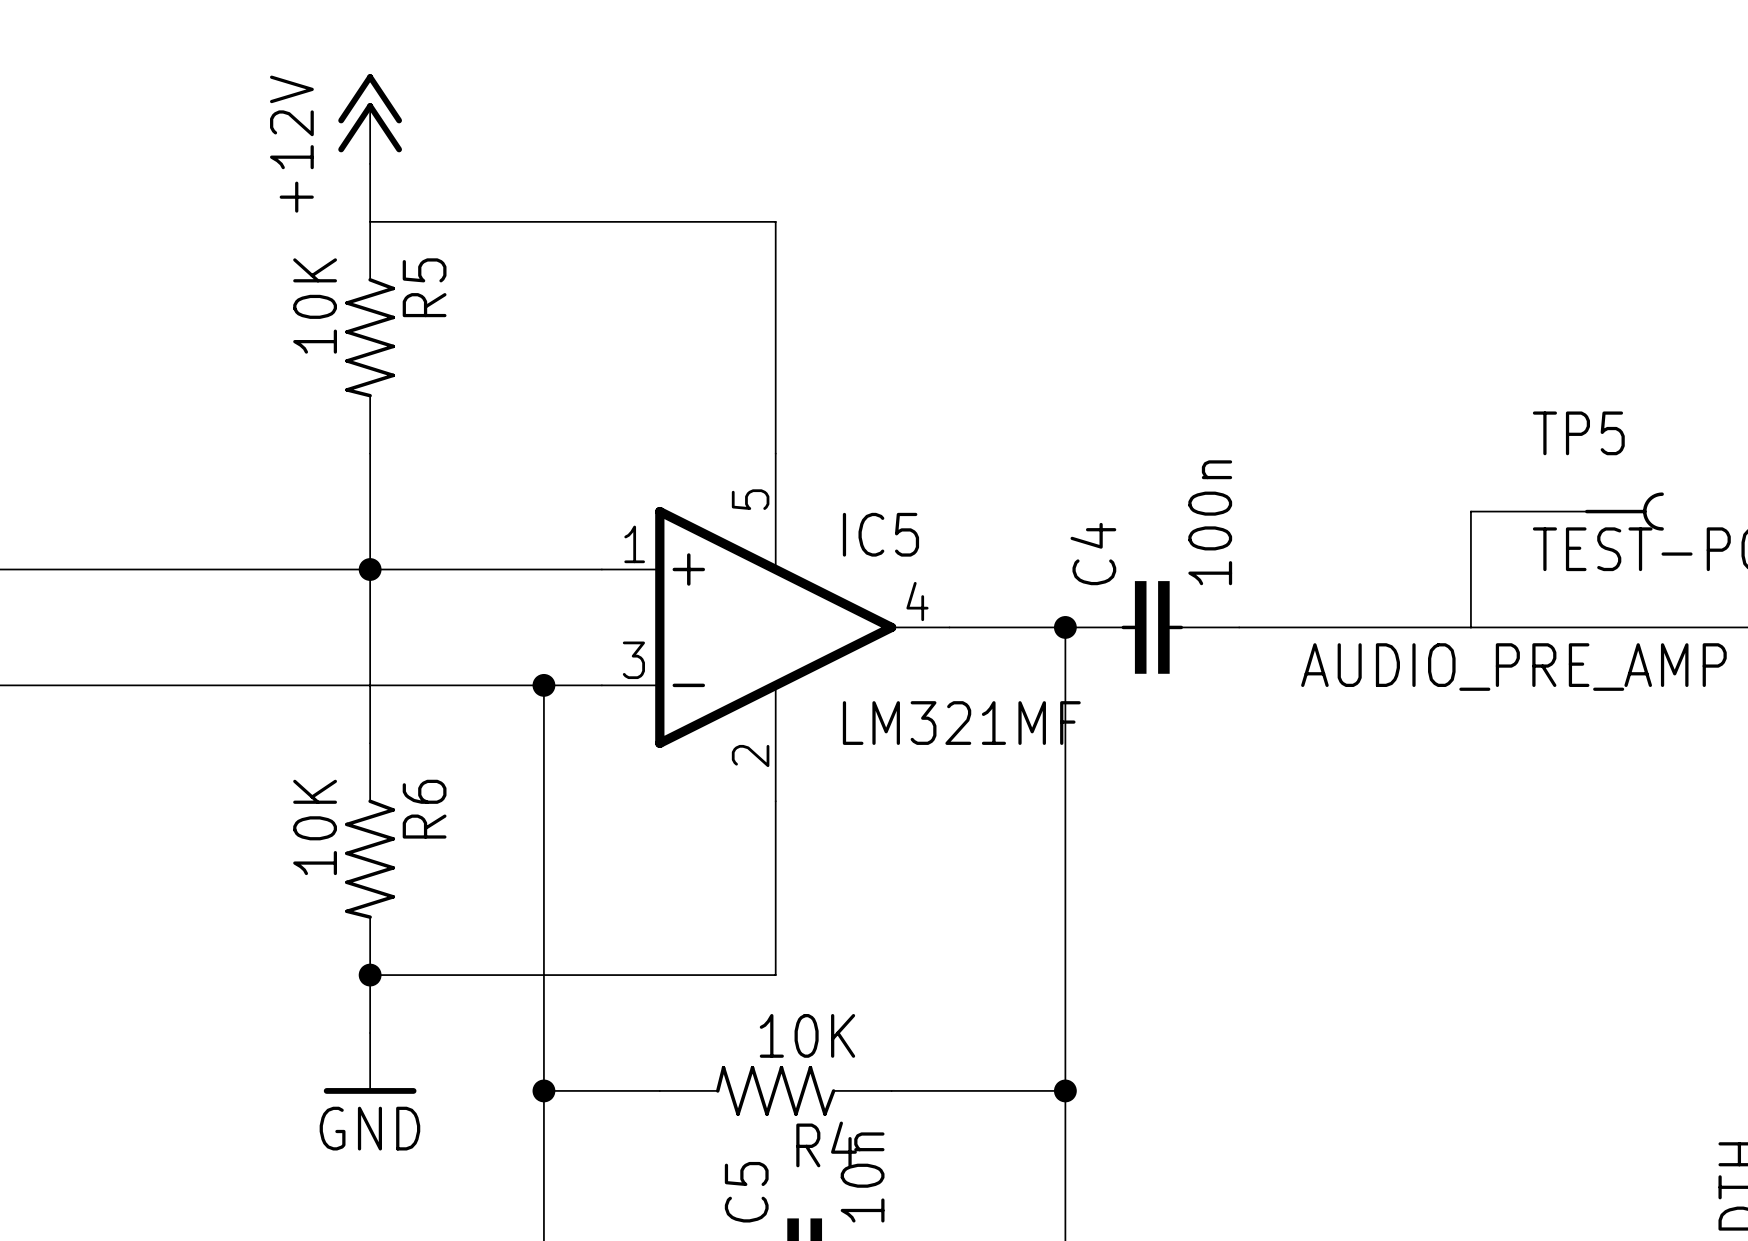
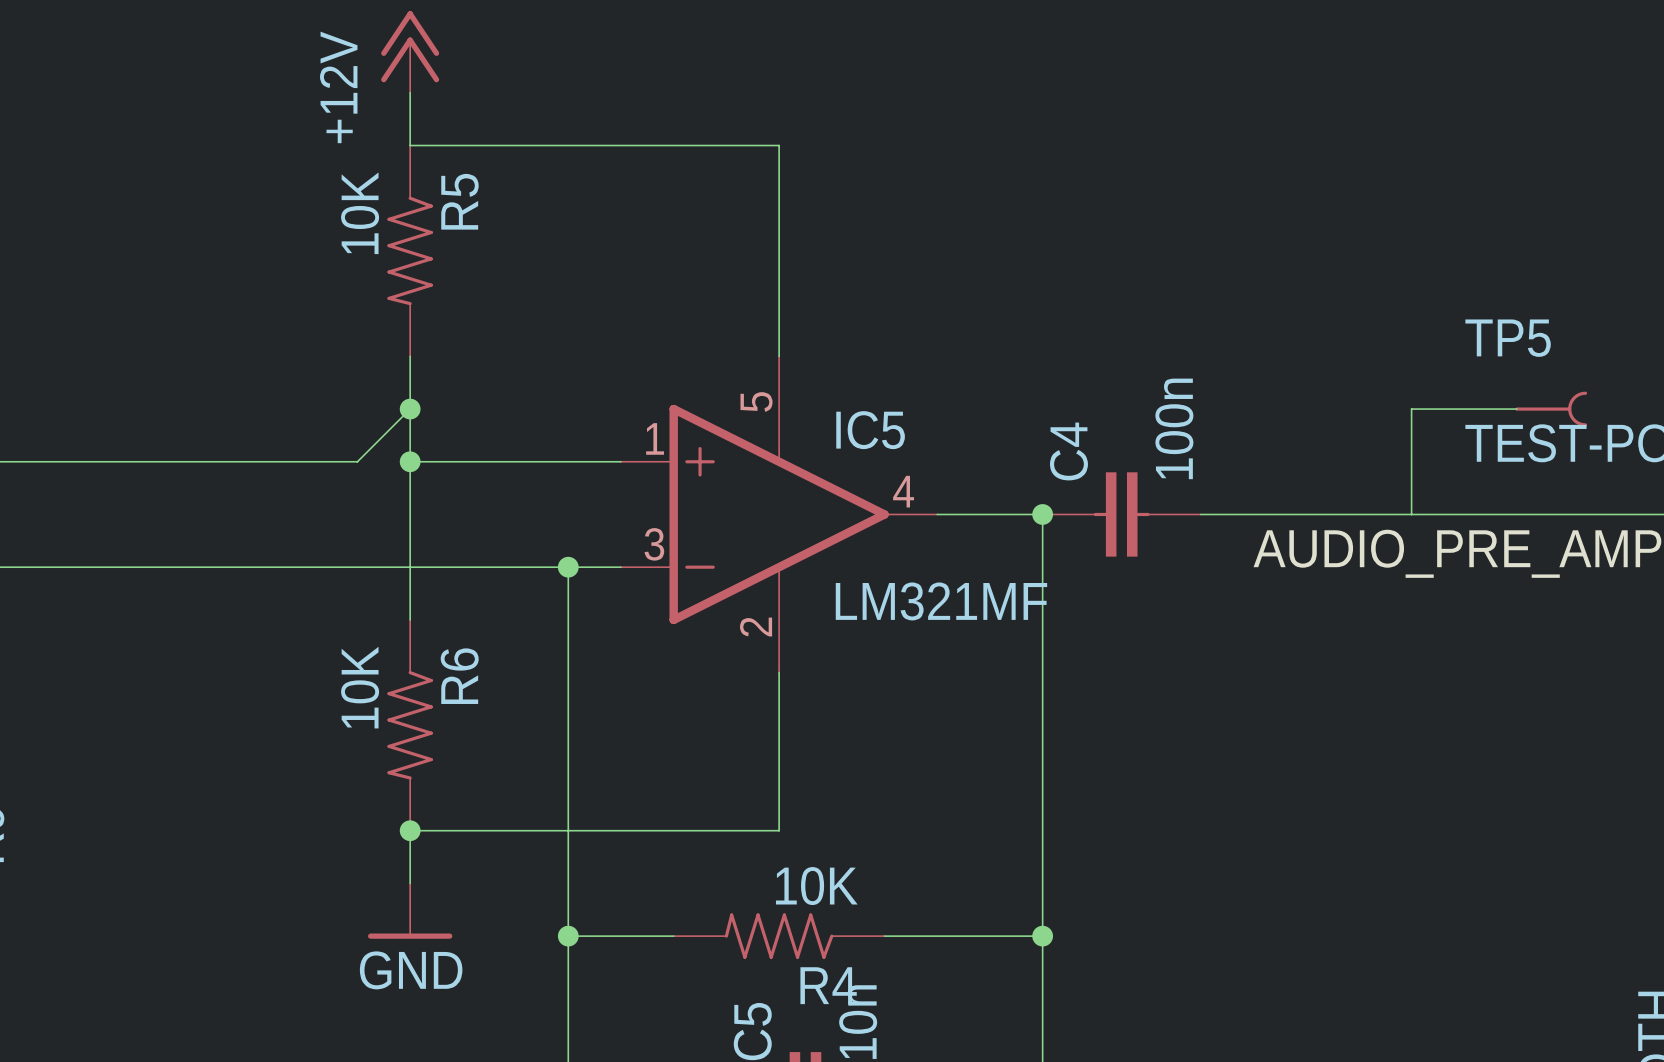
junction: none -> (410, 409)
wire: (312, 569) (370, 569) -> (357, 461) (410, 409)

